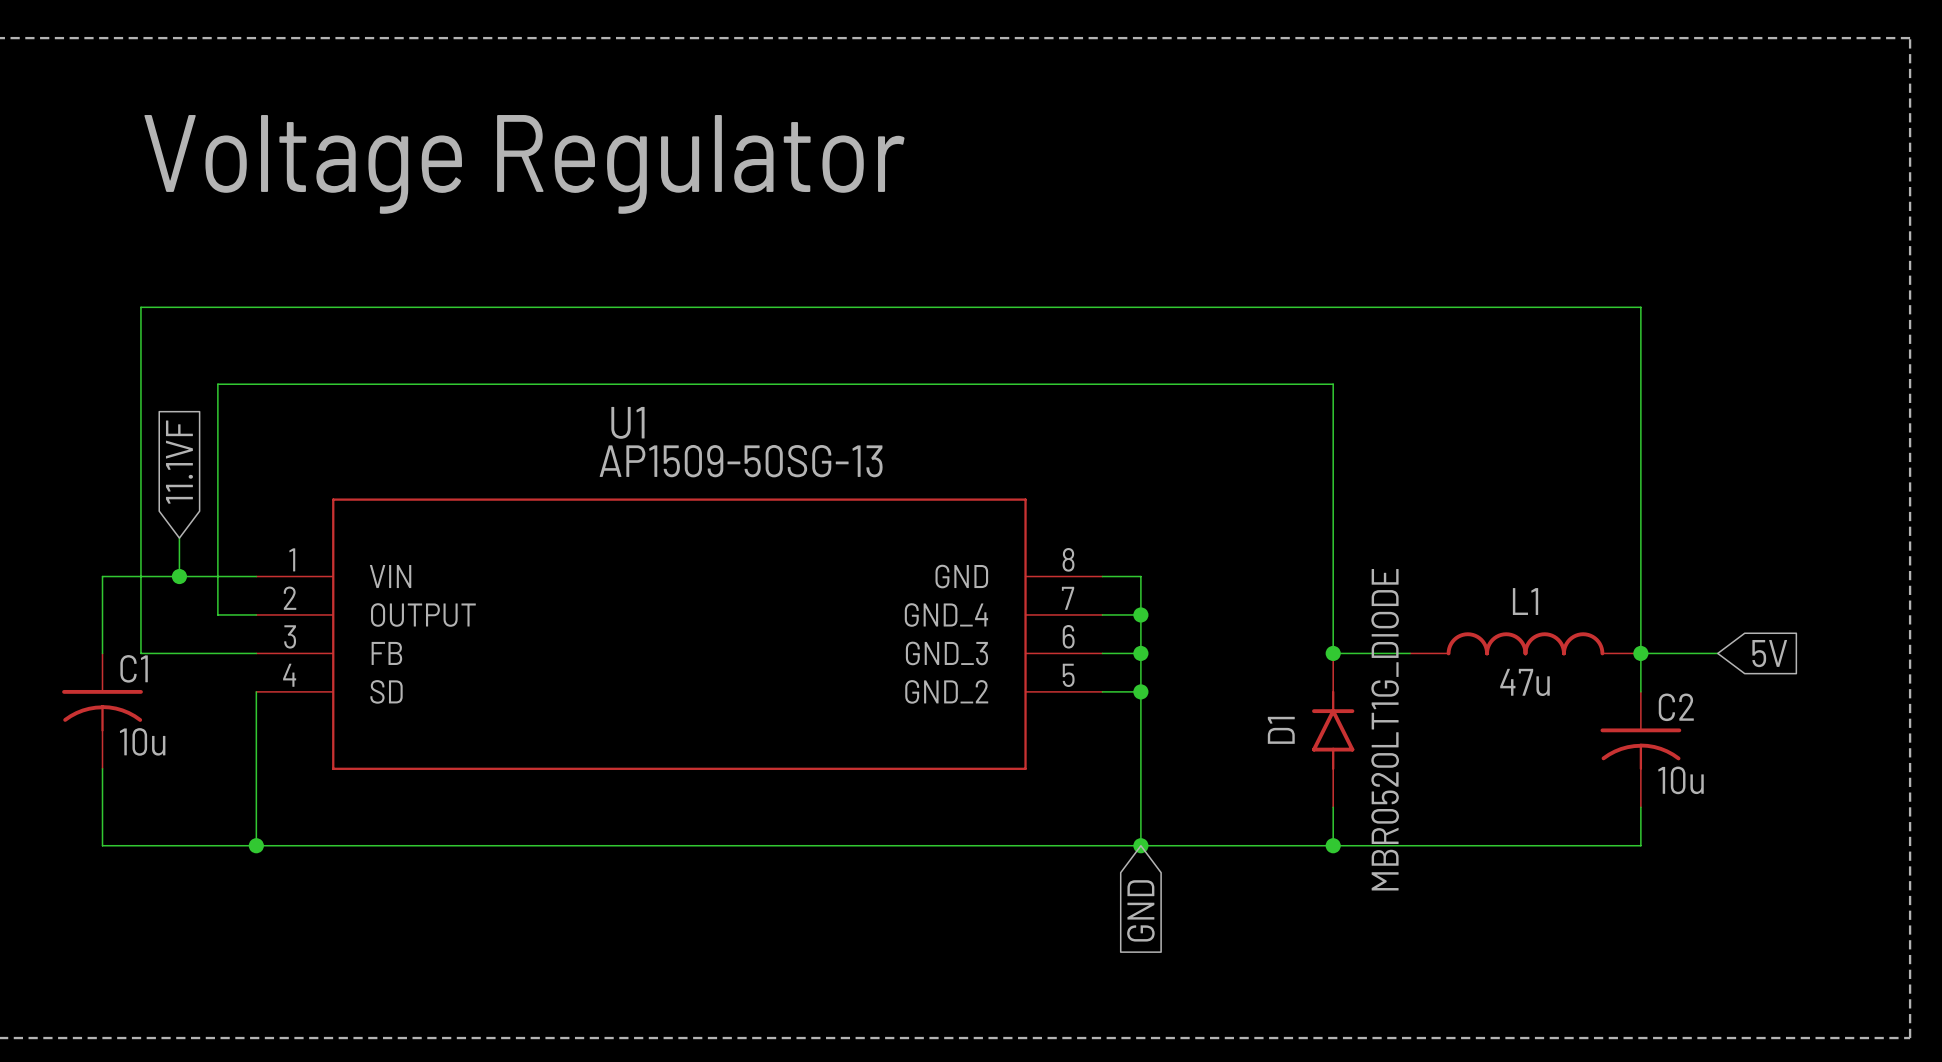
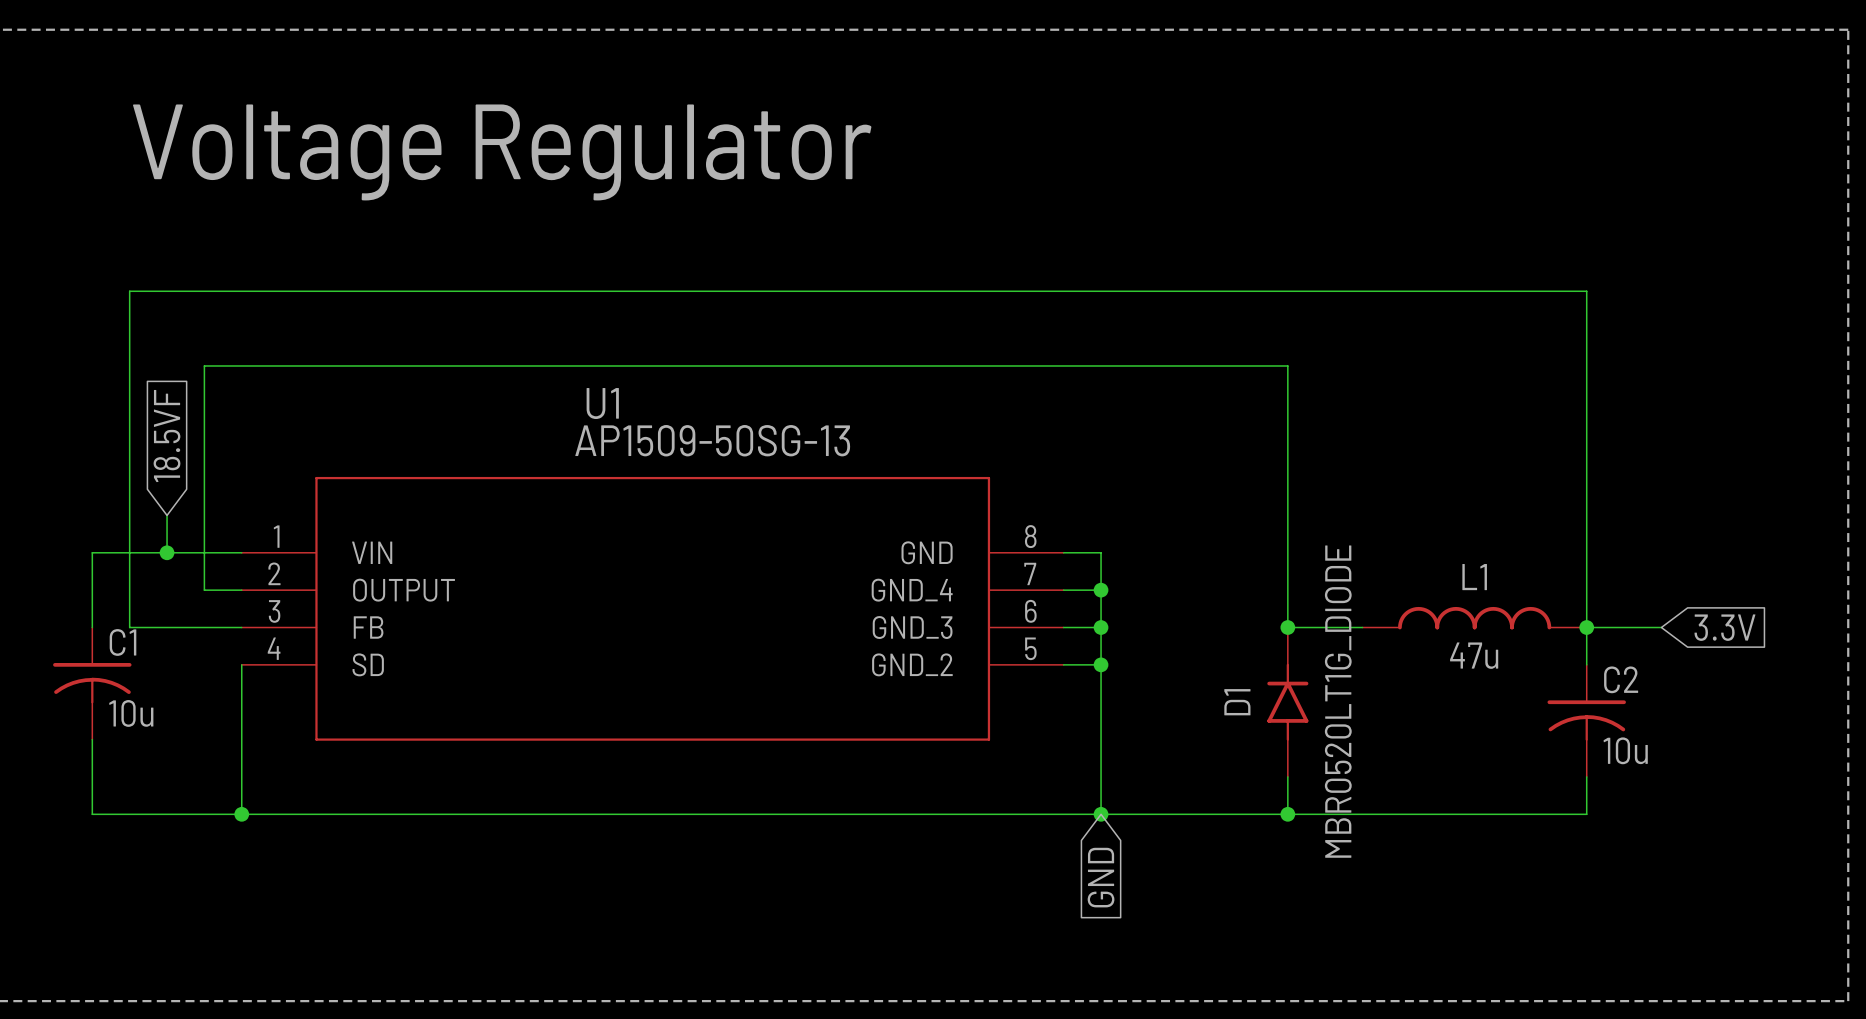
global label: 11.1VF (179, 462) -> 18.5VF (166, 436)
global label: 5V (1769, 653) -> 3.3V (1725, 627)

